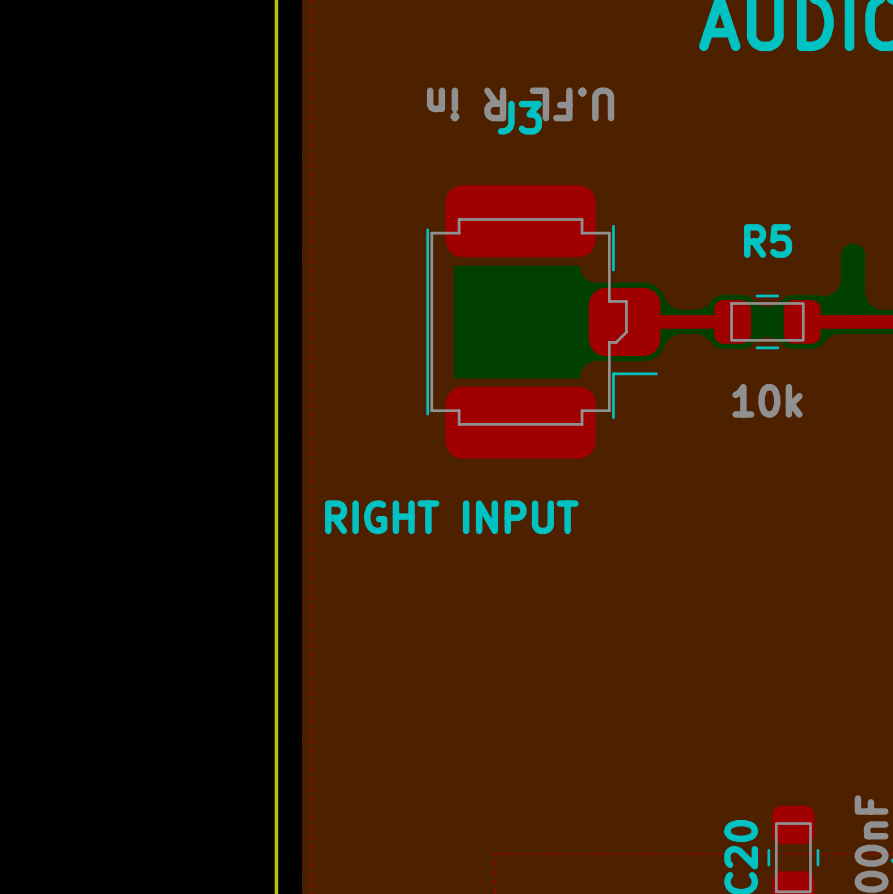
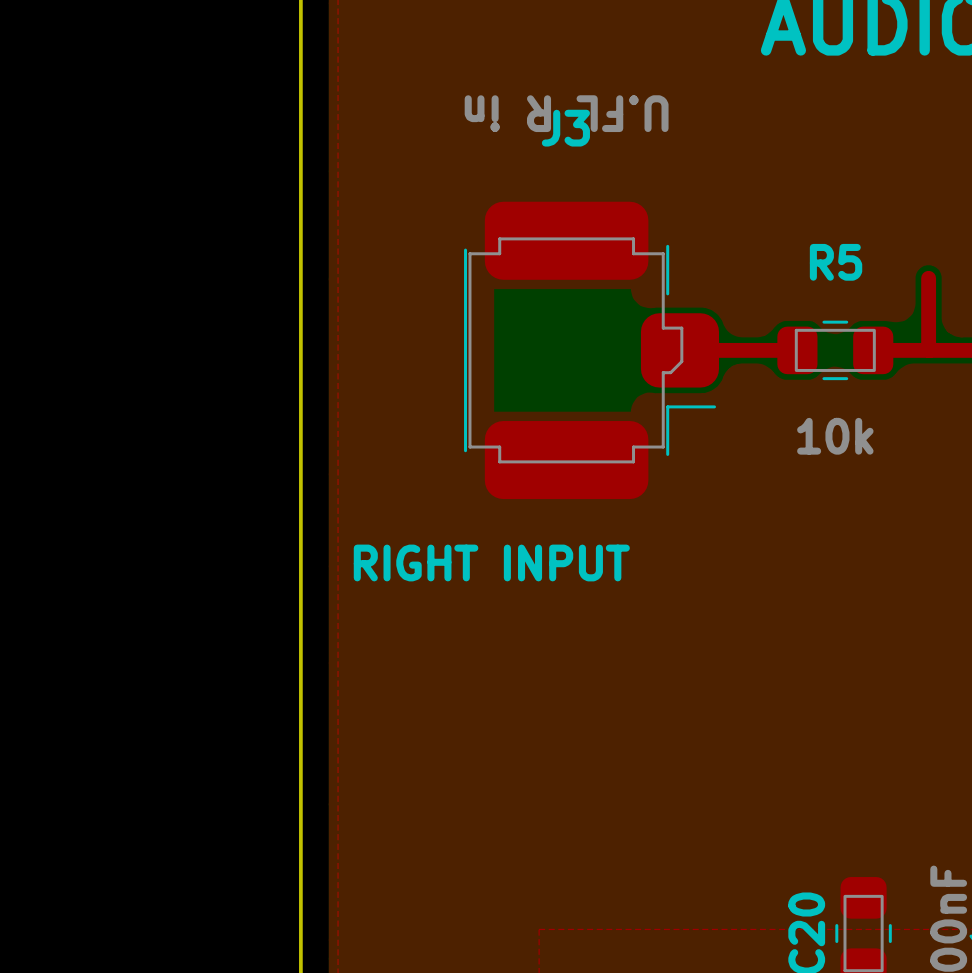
top track: none -> (928, 278) (928, 349)

